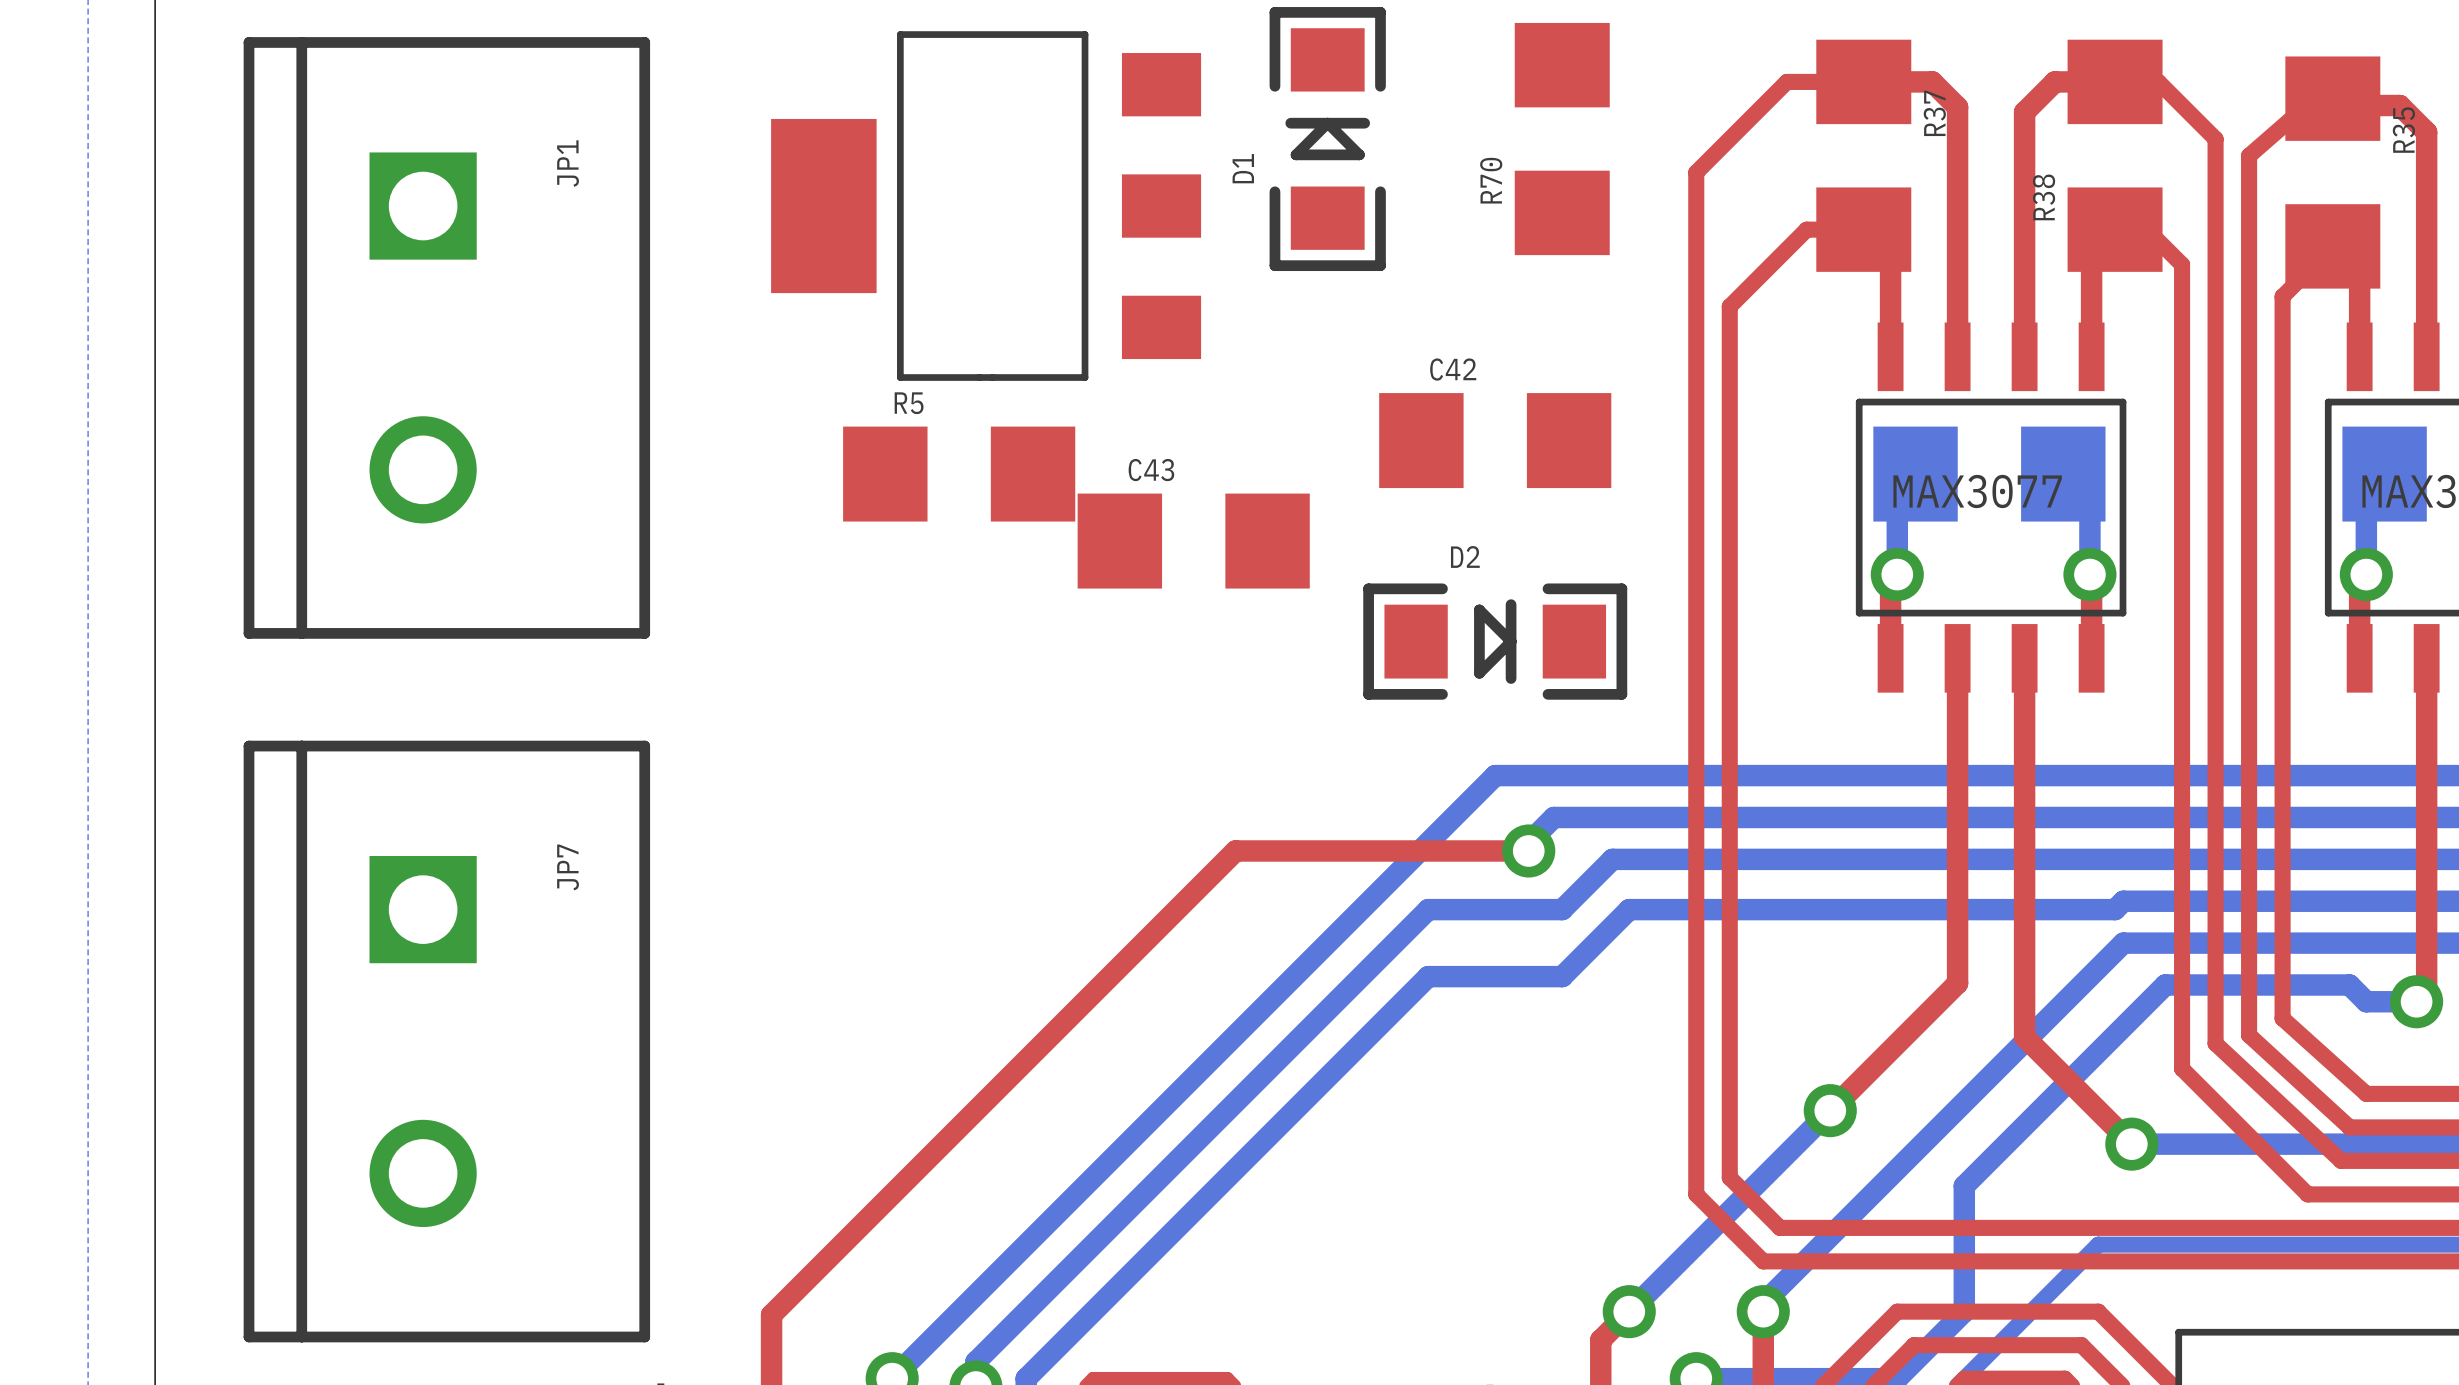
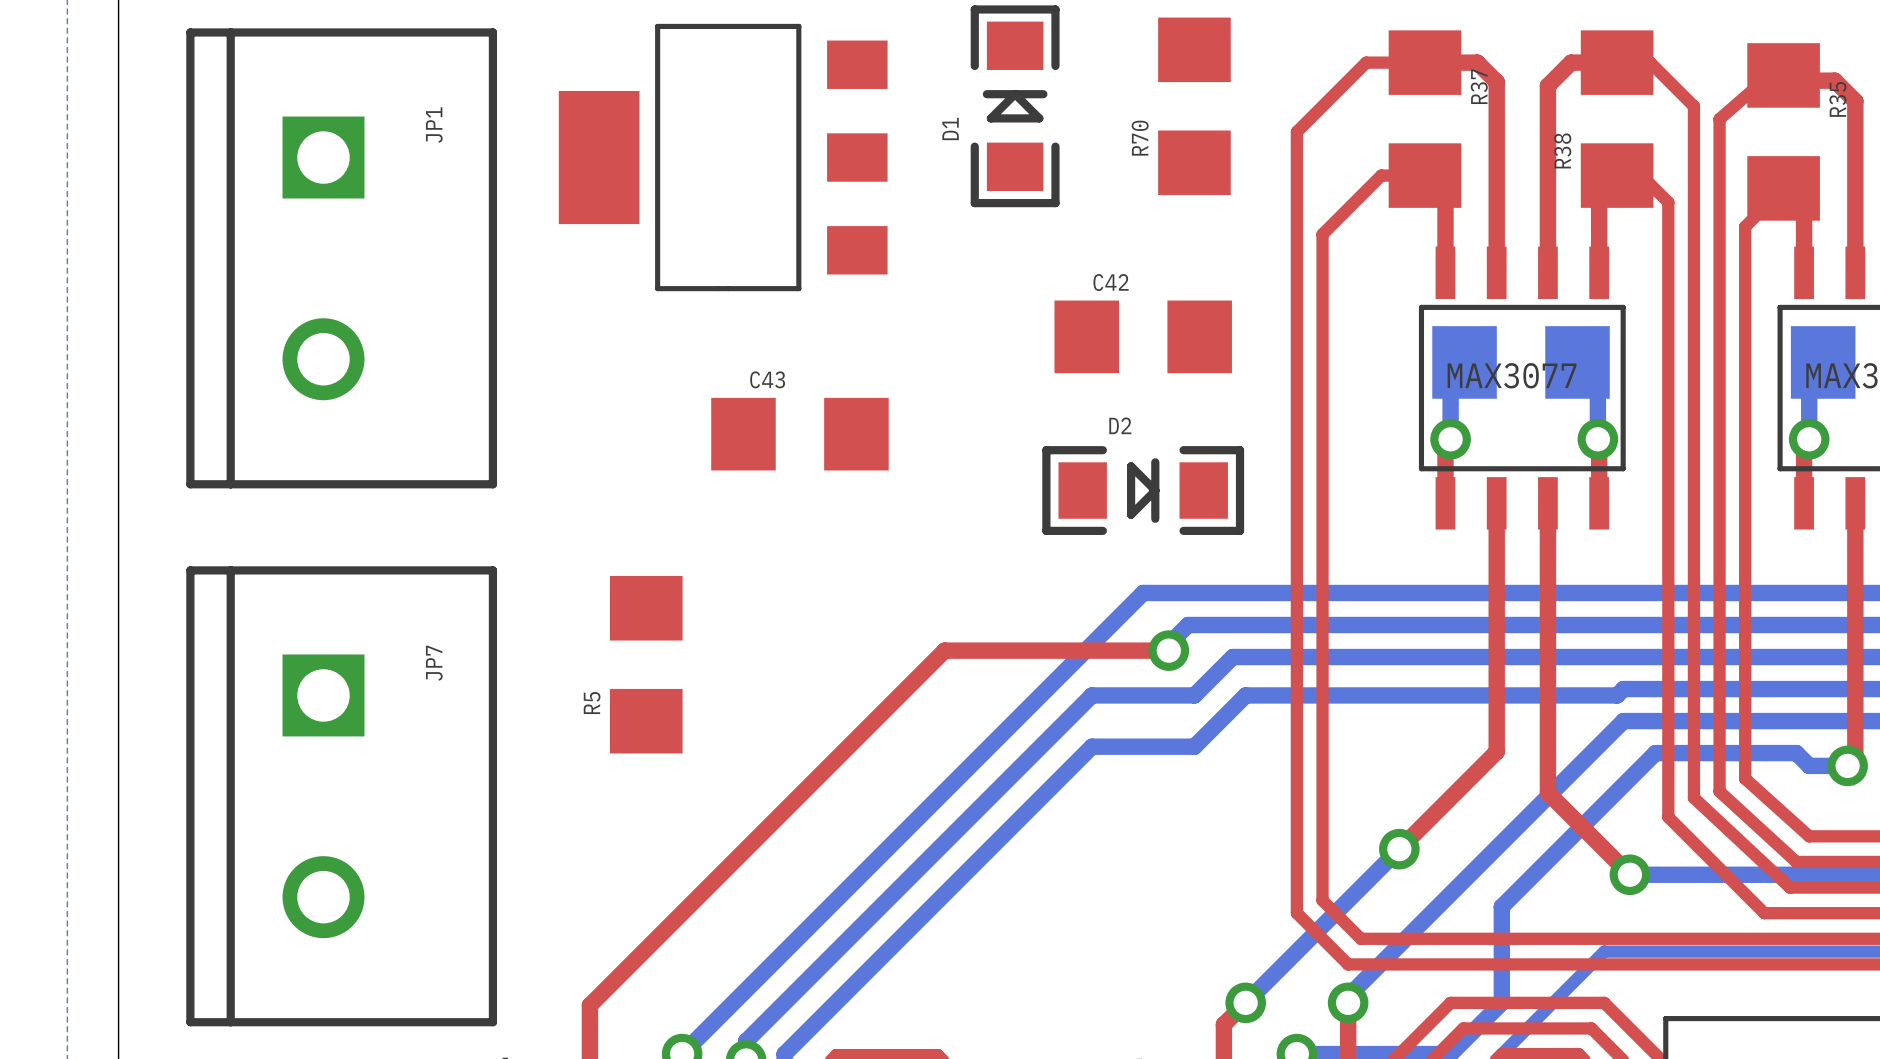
part position: (986, 206) -> (723, 157)
R5 name position: R5 (909, 403) -> R5 (592, 703)
R5 rotation: 0° (959, 474) -> 90° clockwise (646, 664)
R5 position: (959, 474) -> (646, 664)
C43 position: (1193, 541) -> (799, 434)

